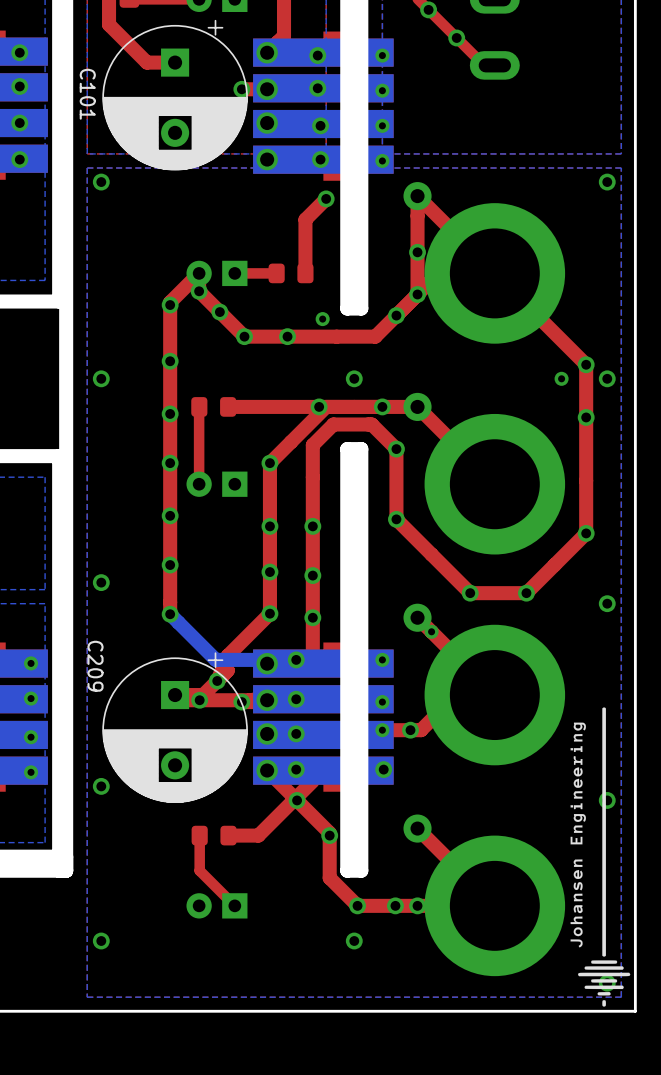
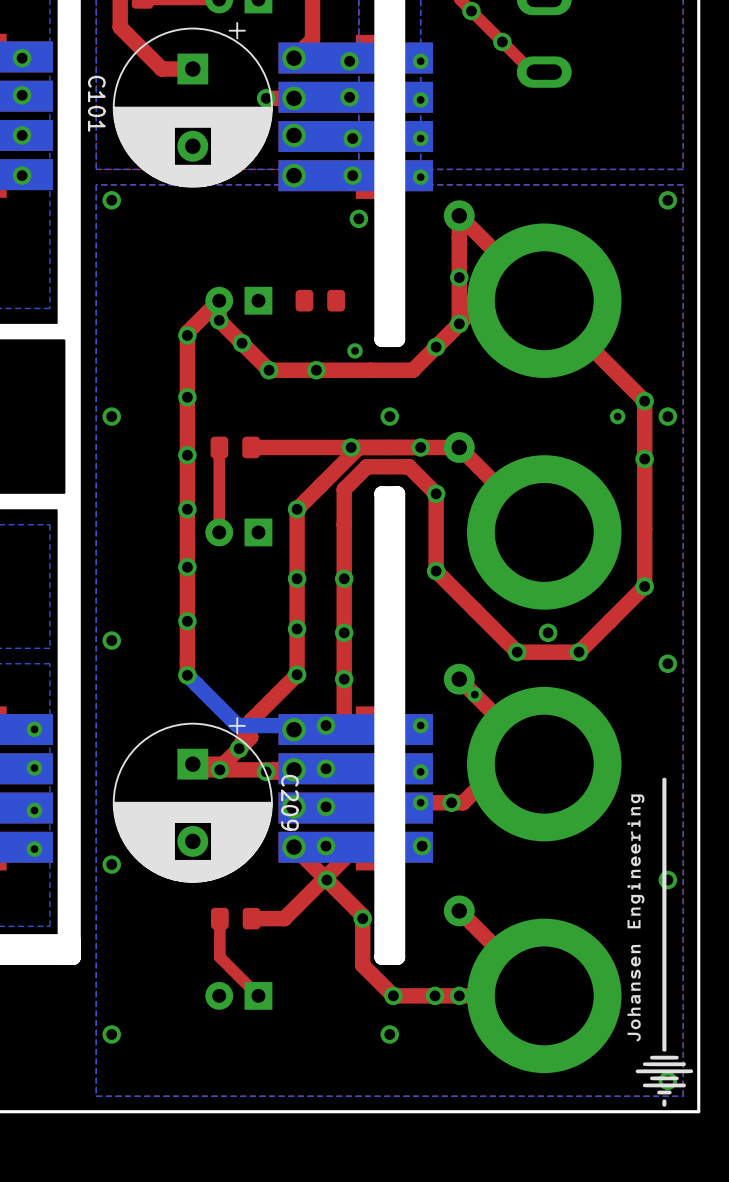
top track: (326, 198) (305, 219) (305, 273) -> none
top track: (276, 273) (234, 273) -> none
via: none -> (548, 632)
C209 name position: C209 (95, 666) -> C209 (289, 802)

